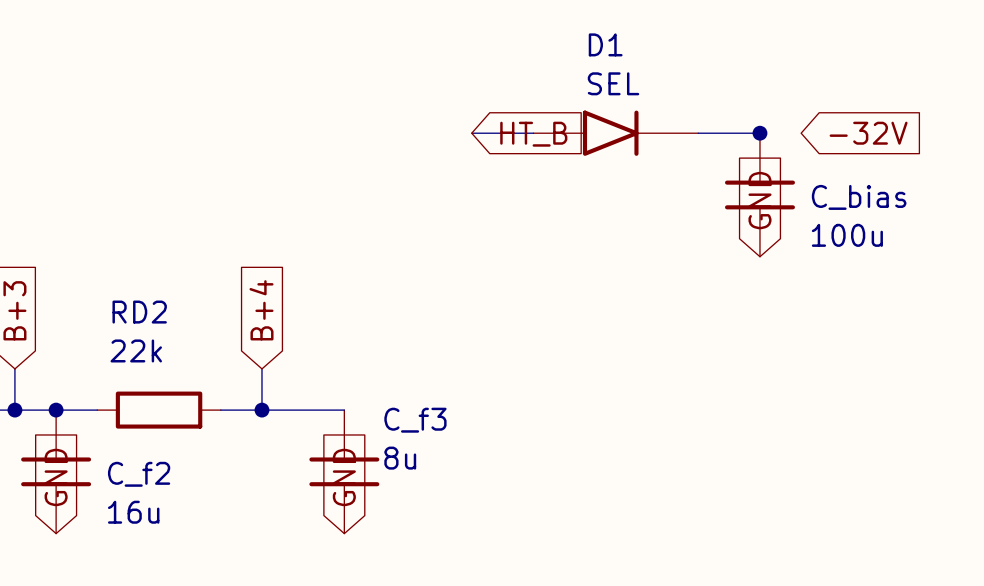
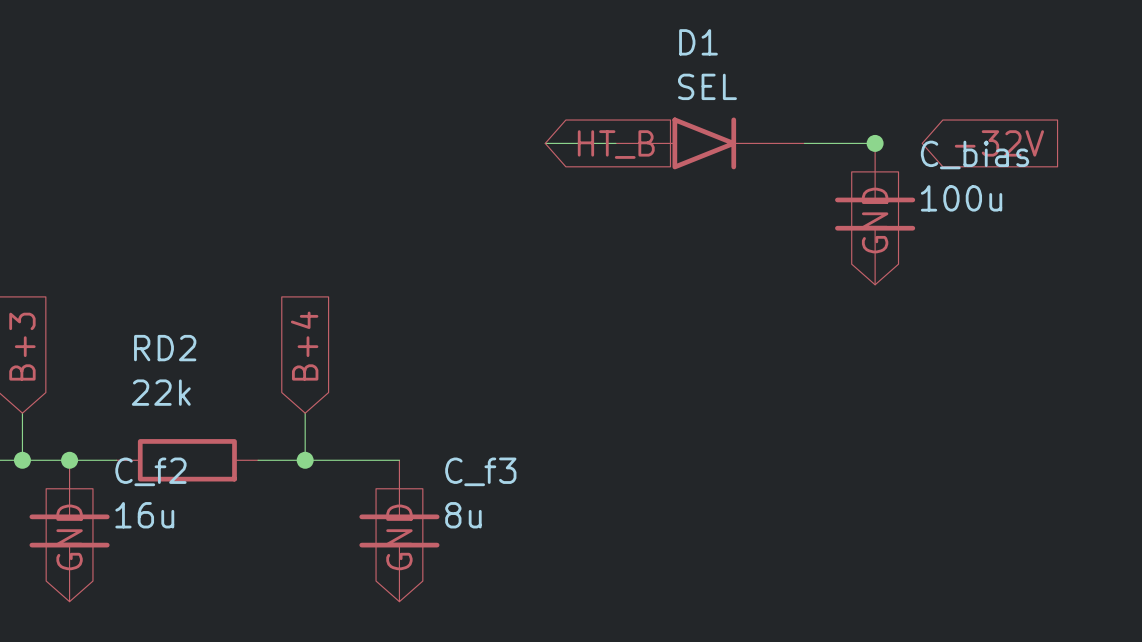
C_bias name position: C_bias (859, 197) -> C_bias (975, 154)
C_bias value position: 100u (847, 235) -> 100u (961, 198)
C_f2 name position: C_f2 (139, 474) -> C_f2 (150, 471)
C_f2 value position: 16u (133, 512) -> 16u (144, 515)

